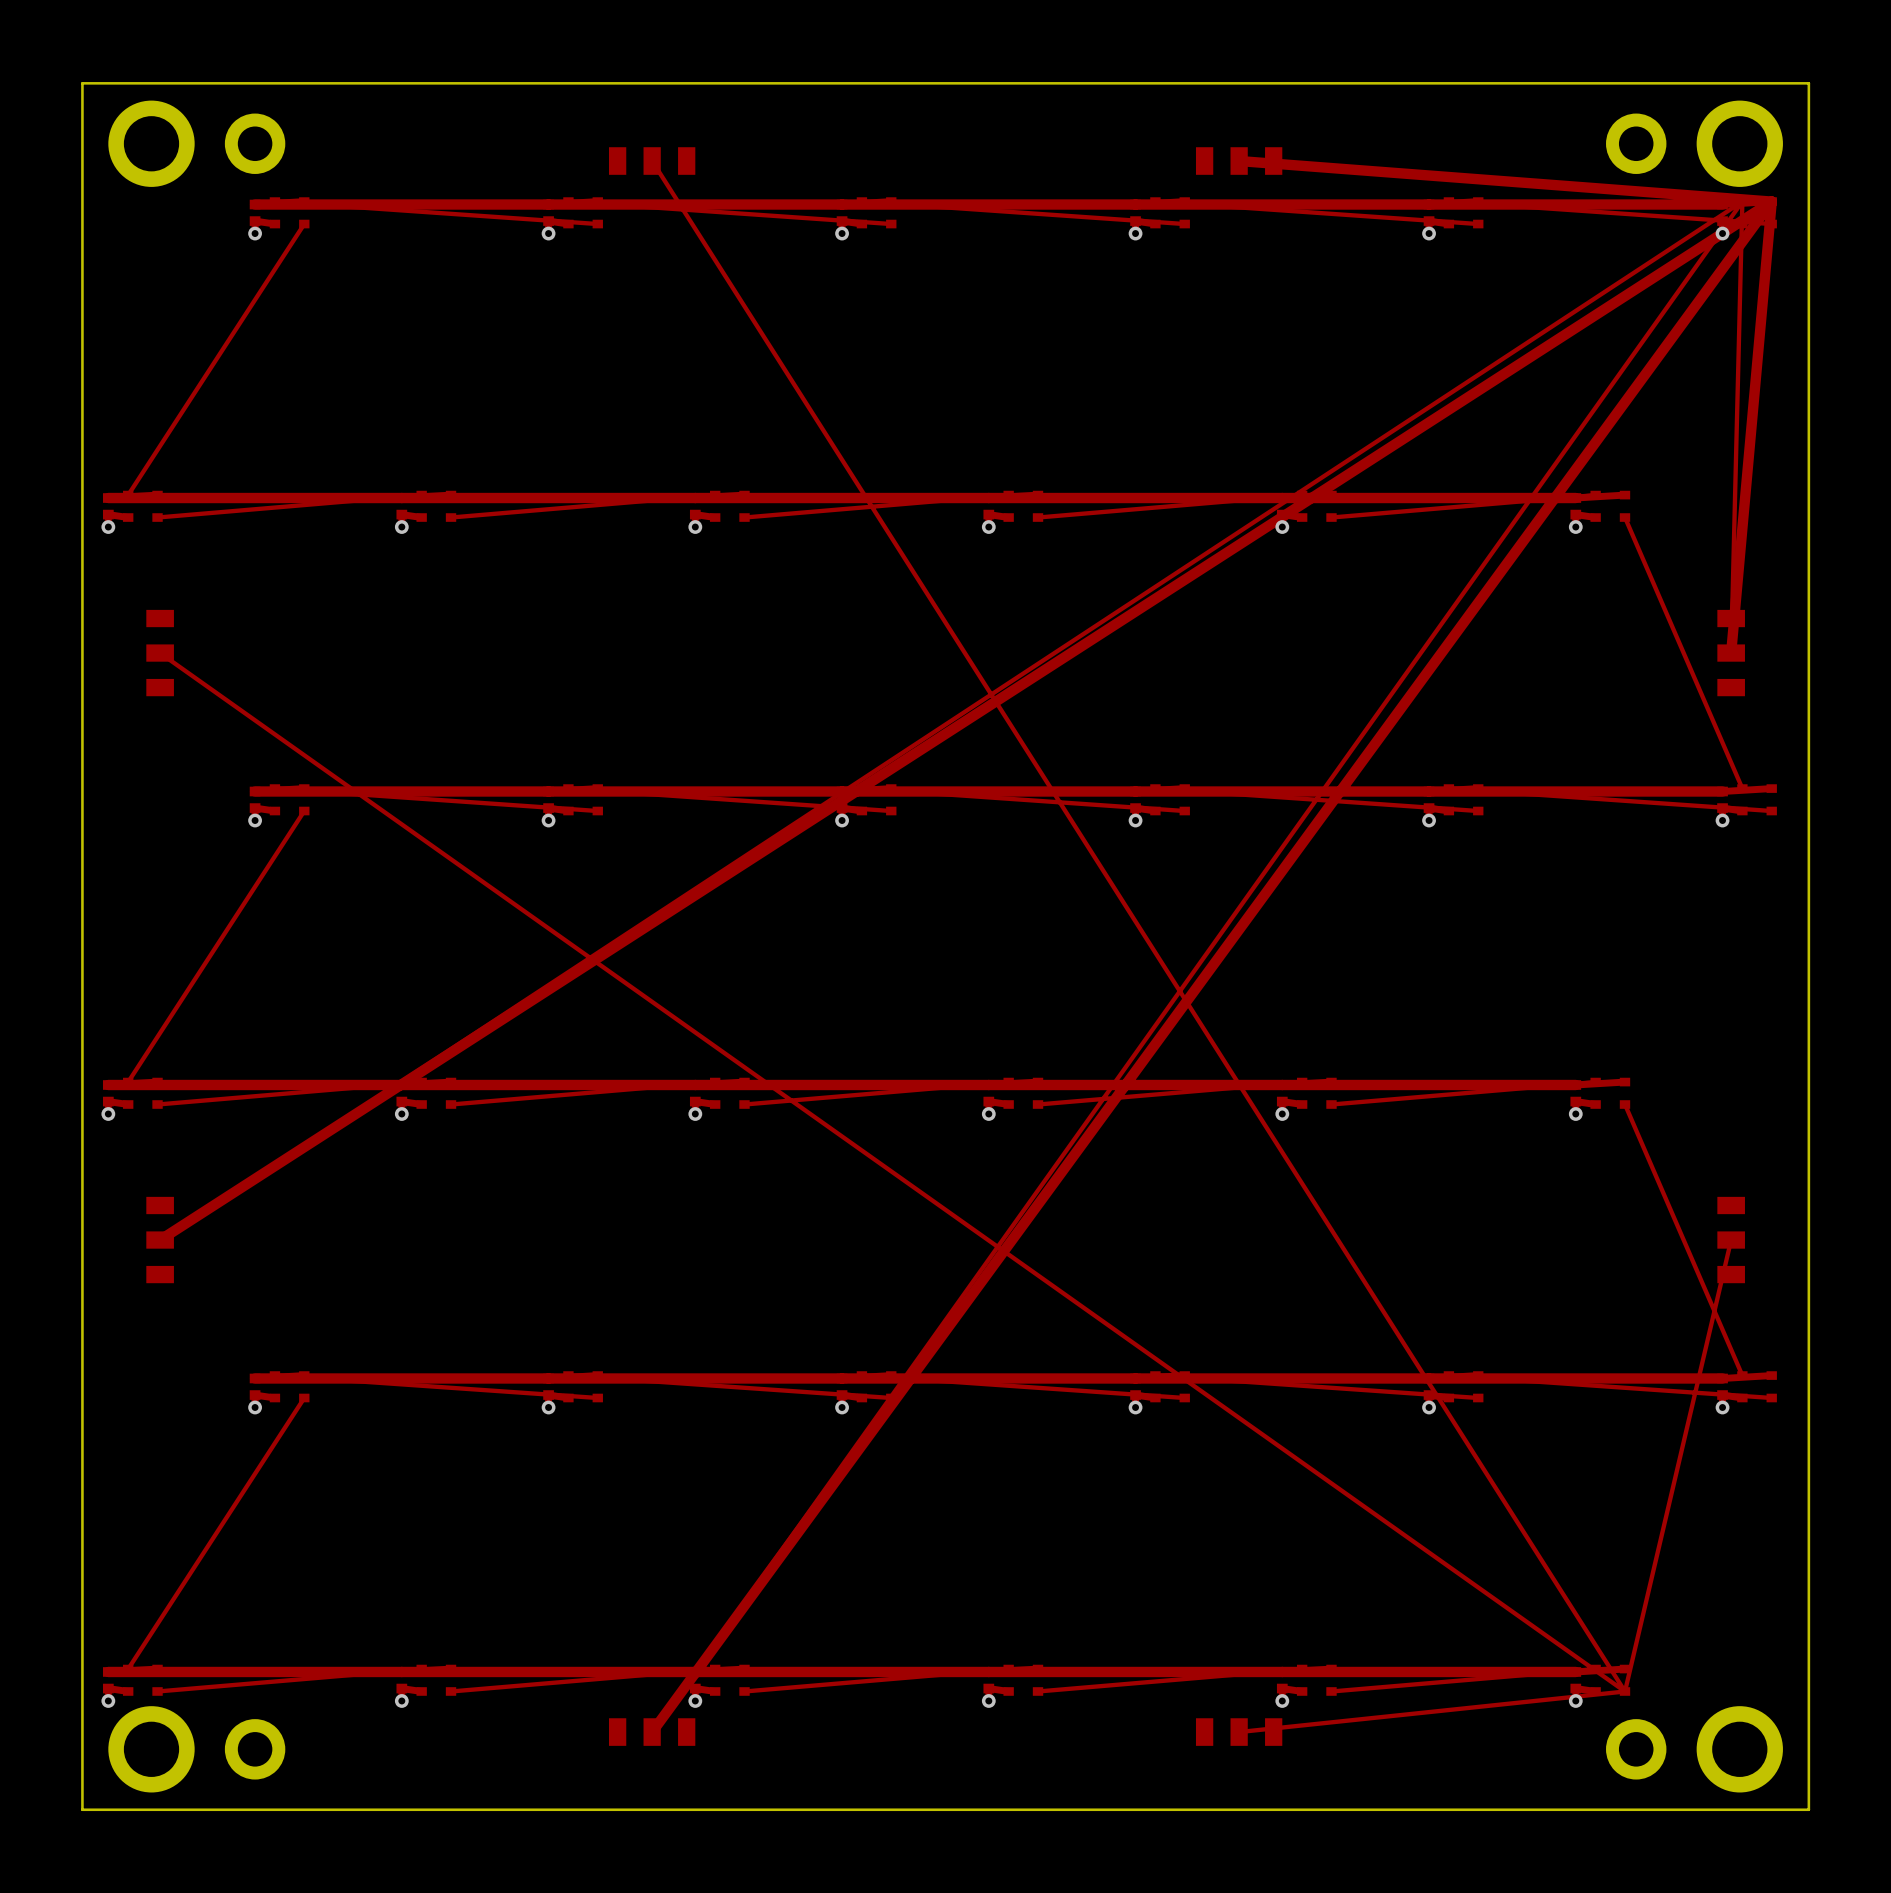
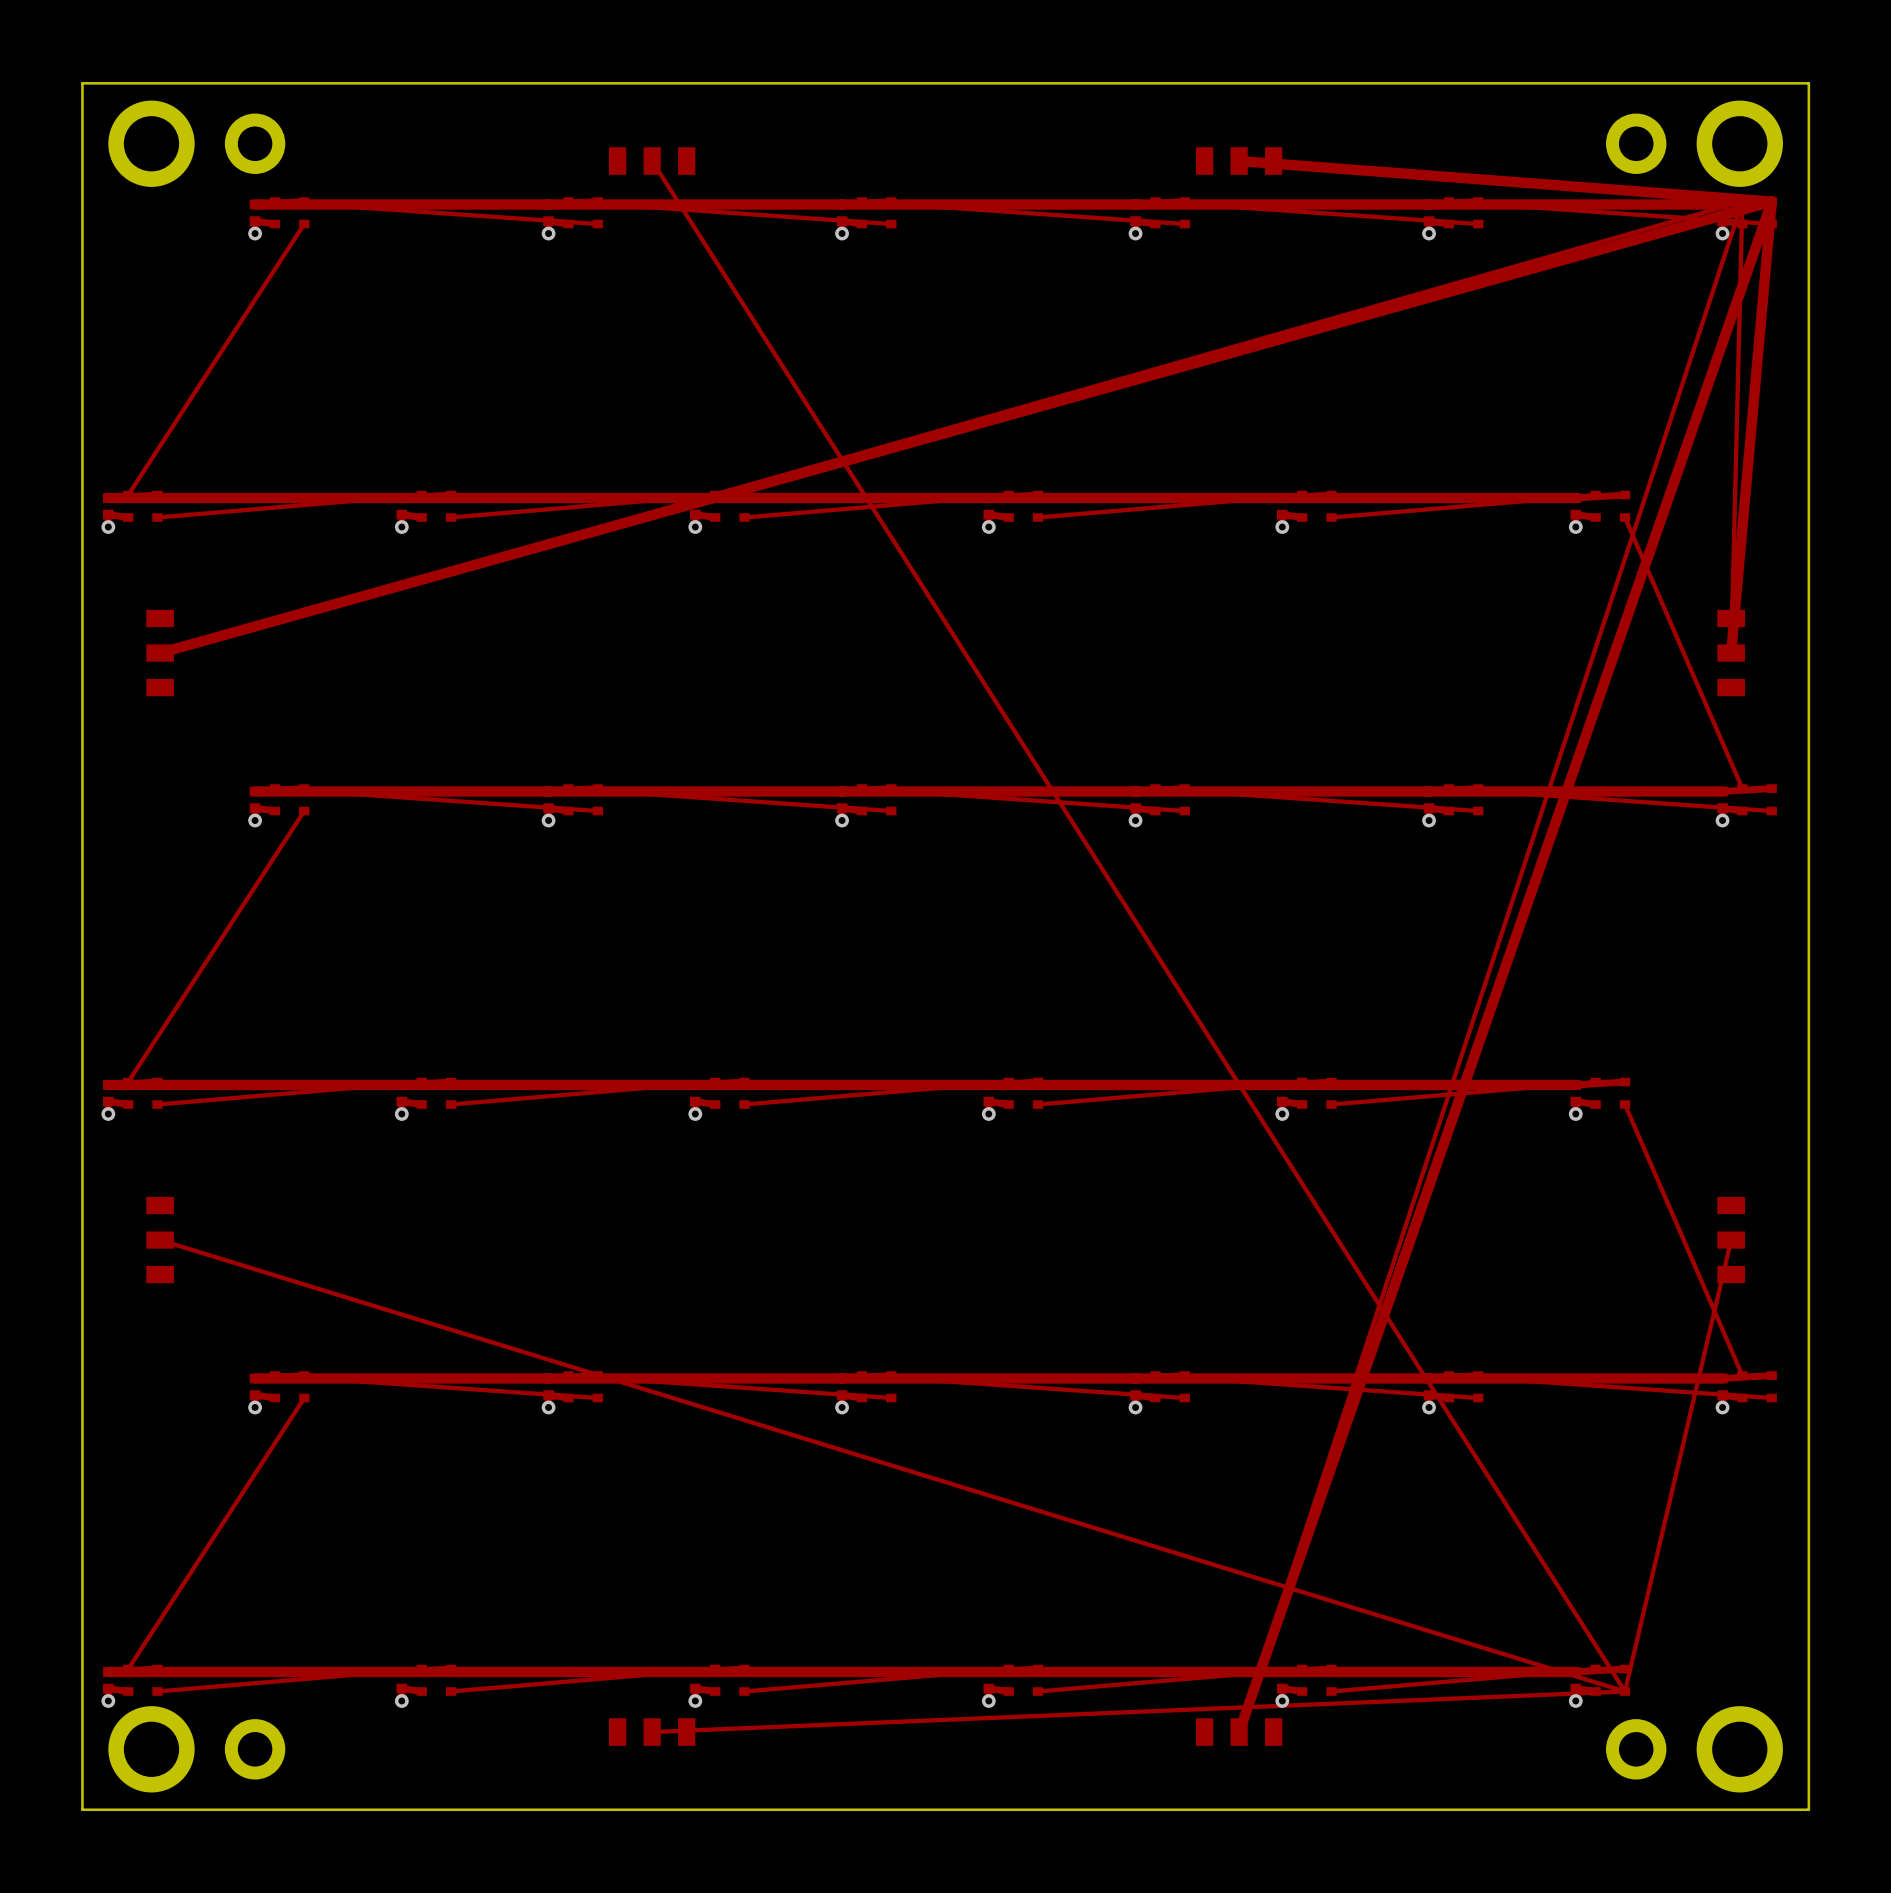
top track: (1771, 201) (160, 1240) (1742, 201) (652, 1732) (1771, 201) -> (1771, 201) (1239, 1732) (1742, 201) (160, 653) (1771, 201)
top track: (160, 653) (1624, 1691) (1239, 1732) -> none
top track: none -> (160, 1240) (1624, 1691) (652, 1732)

